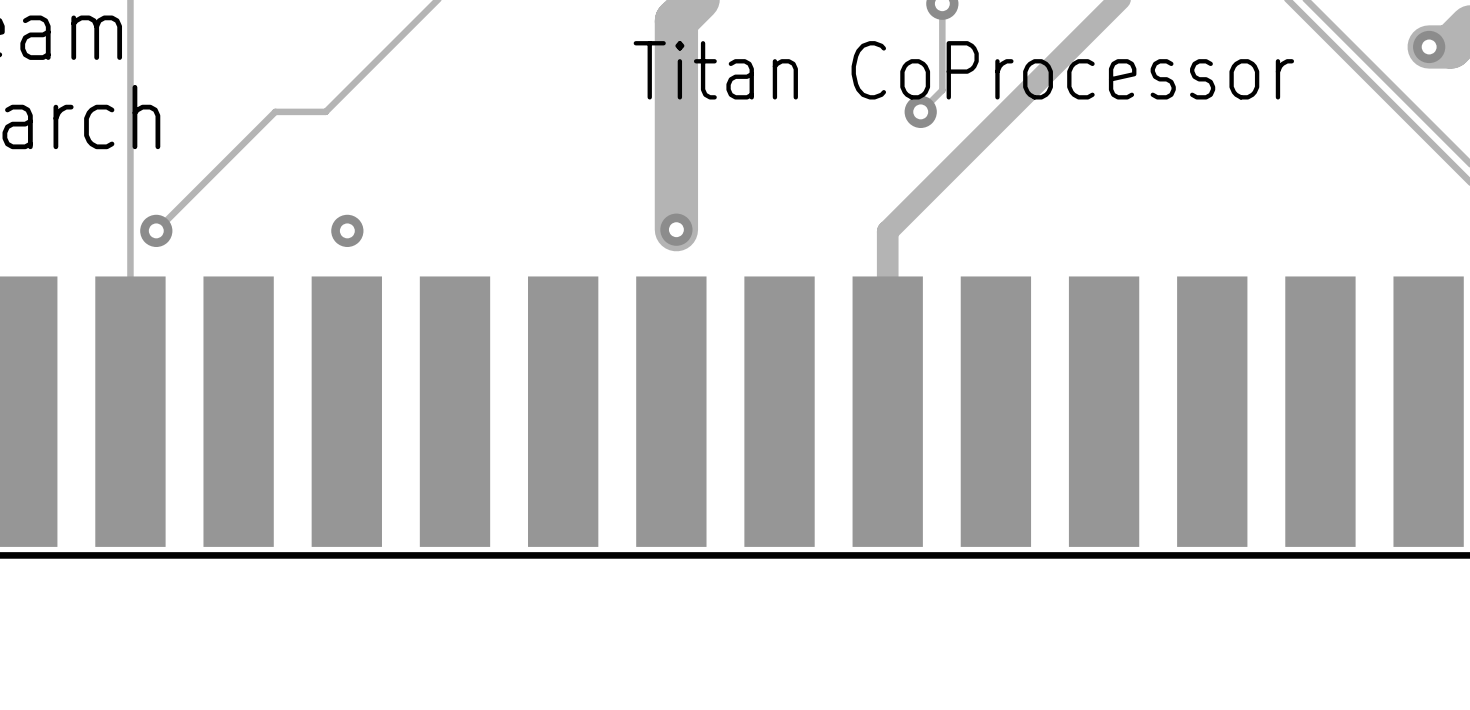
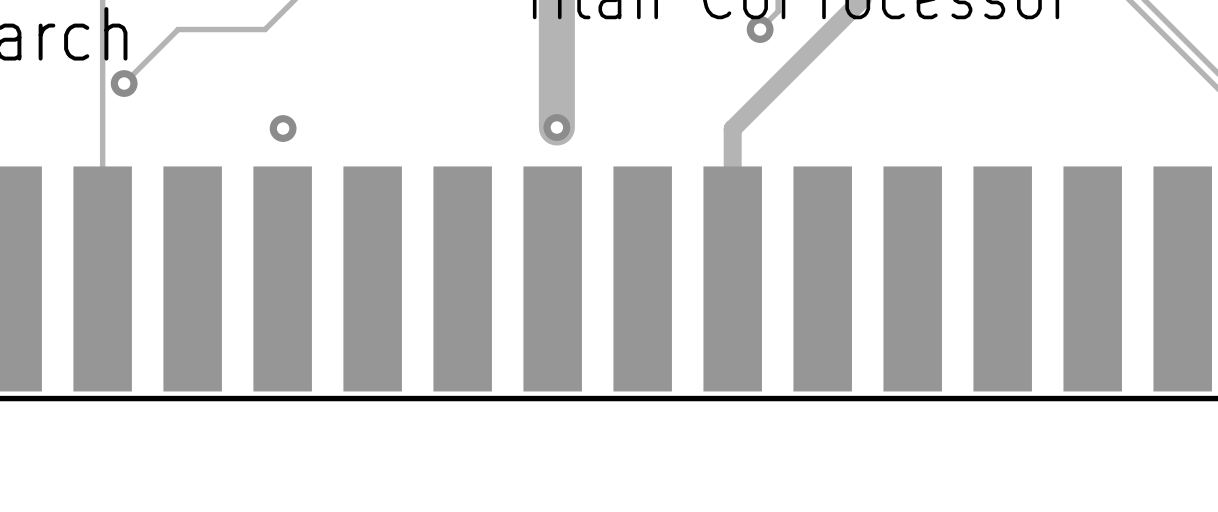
track: (275, 111) (156, 230) -> (223, 29) (178, 29) (124, 83)
via position: (156, 230) -> (124, 83)

